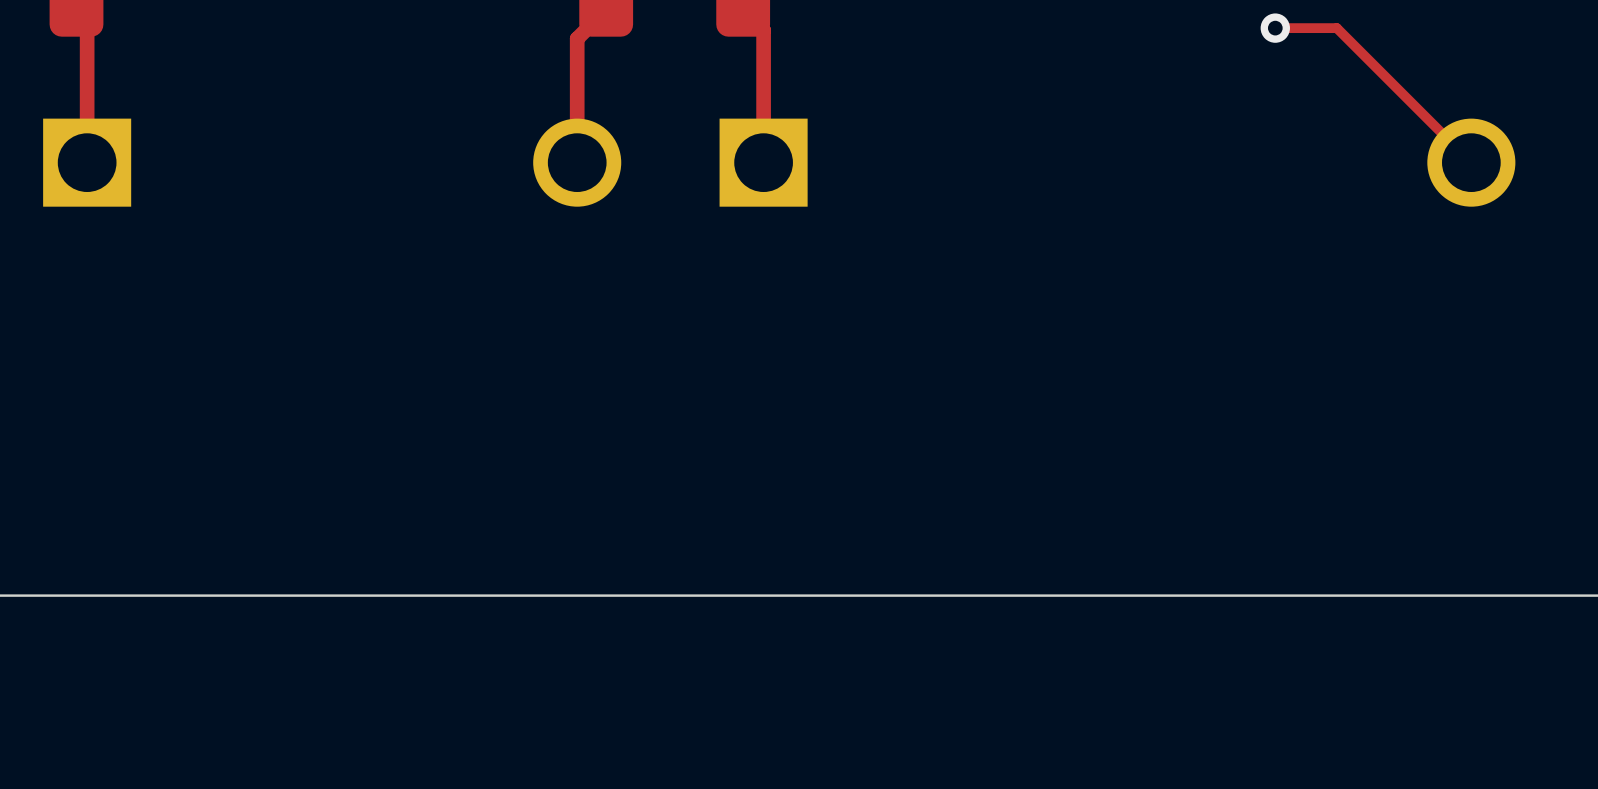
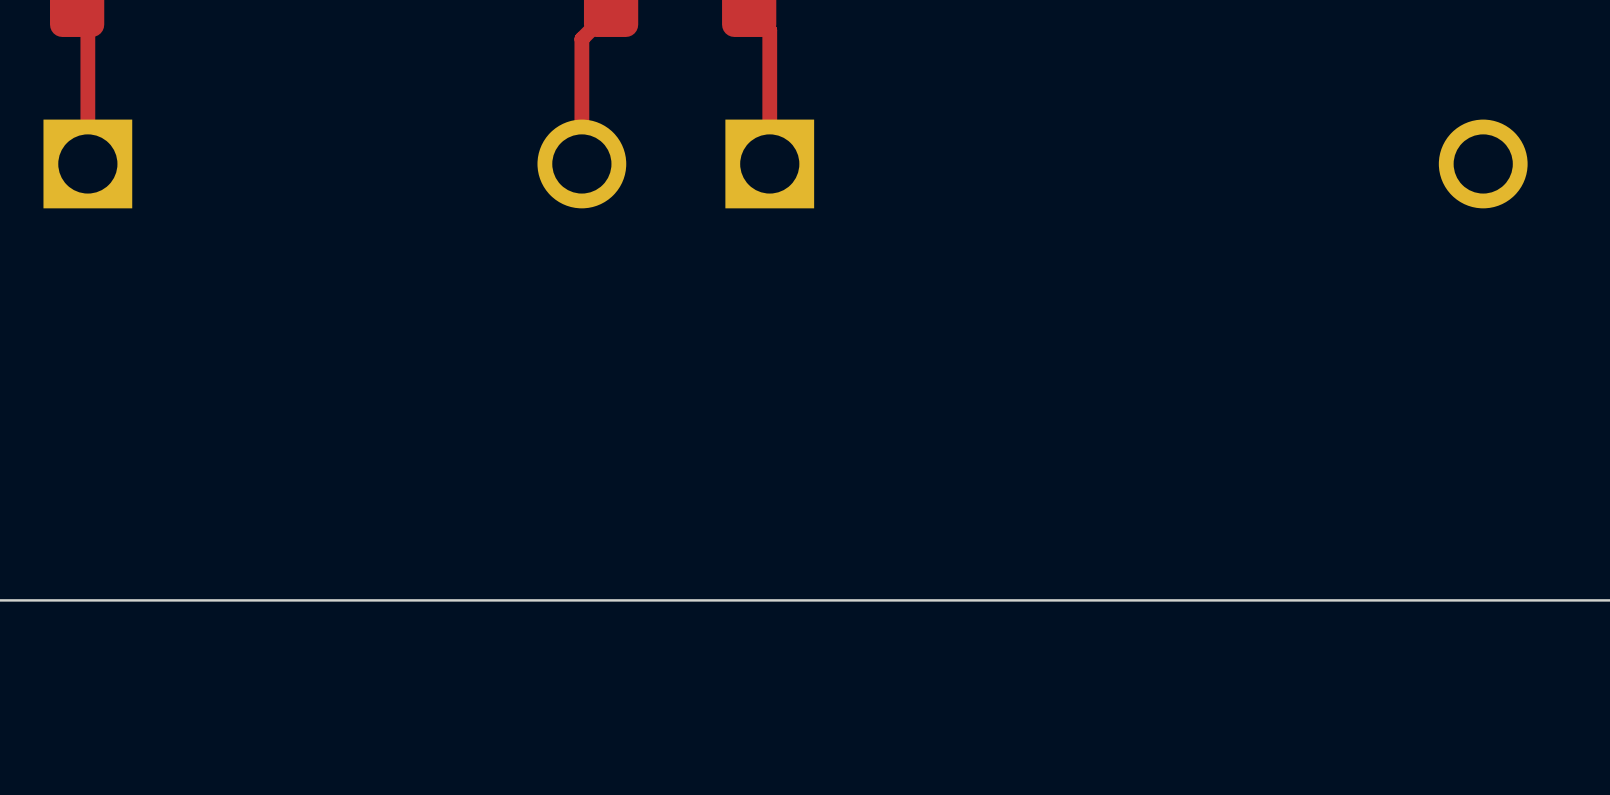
top track: (1275, 28) (1336, 28) (1471, 162) -> none
via: (1275, 28) -> none

